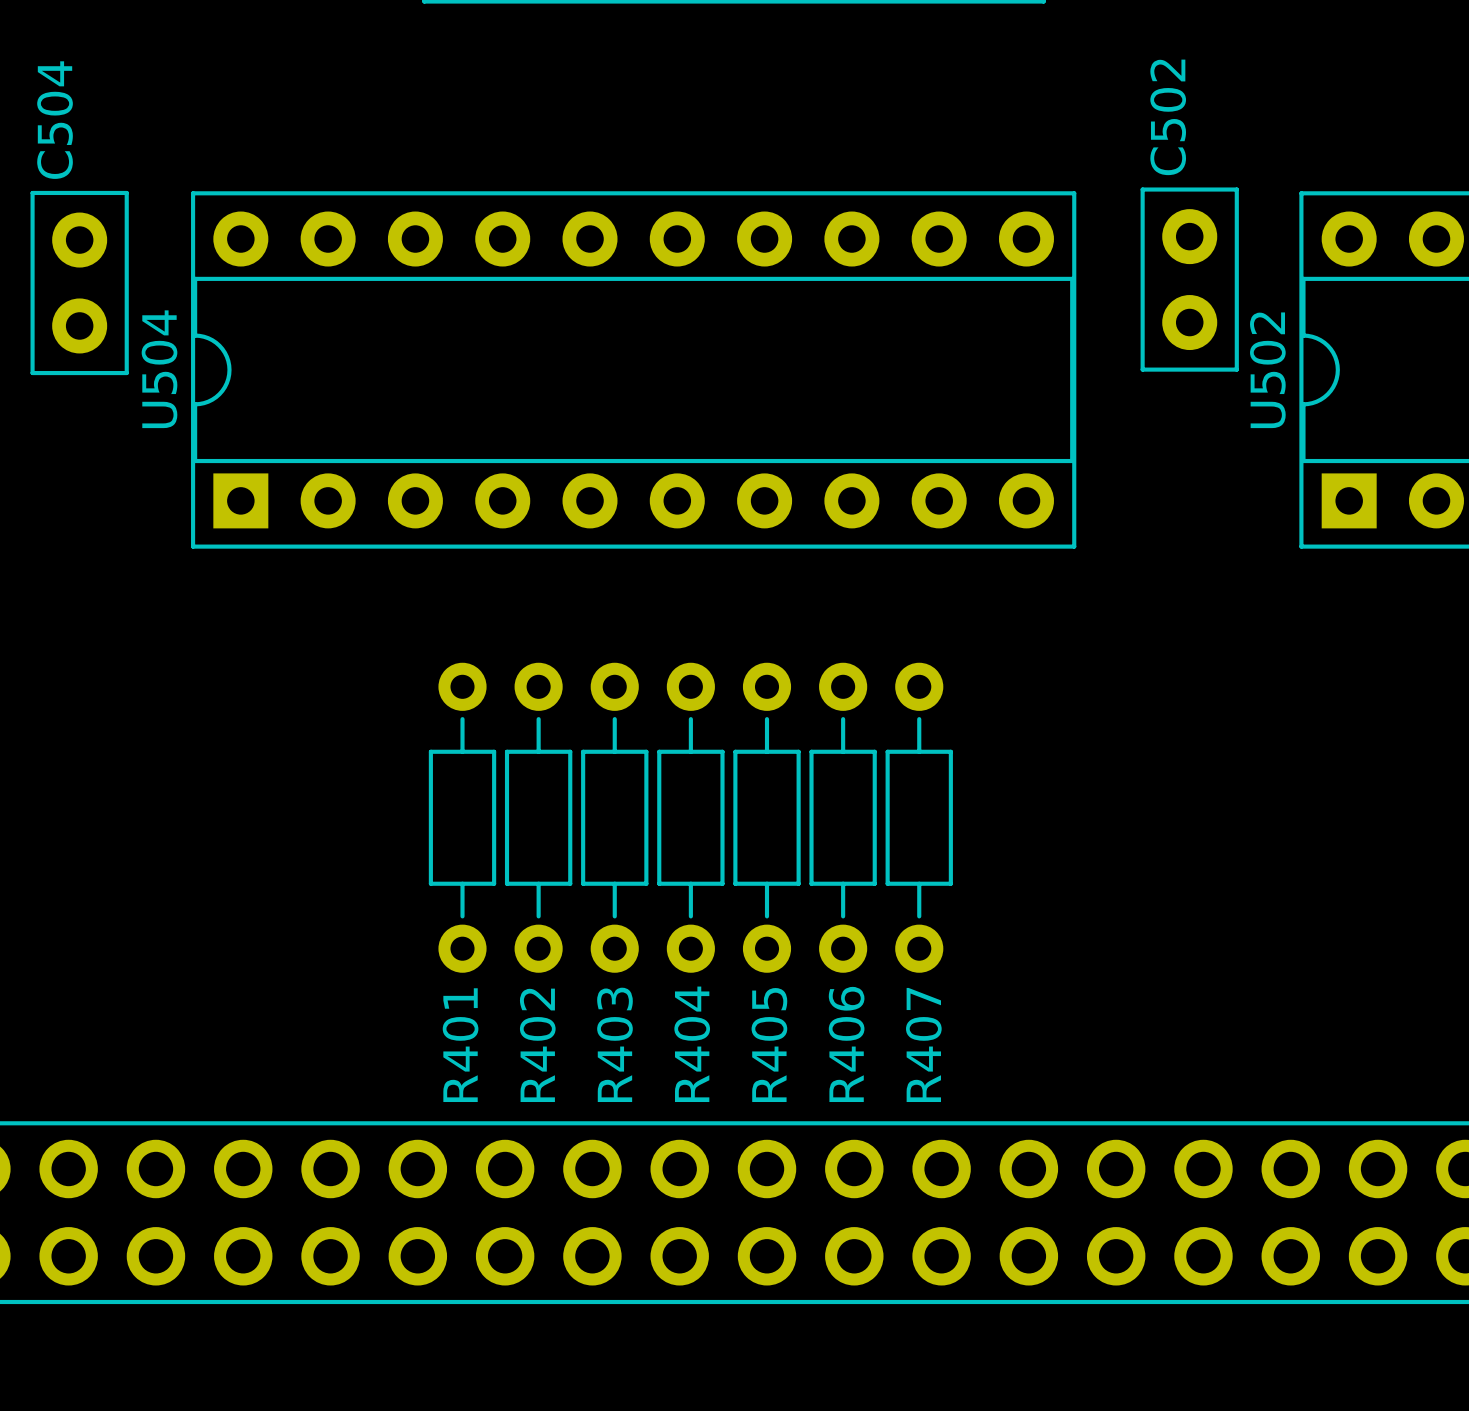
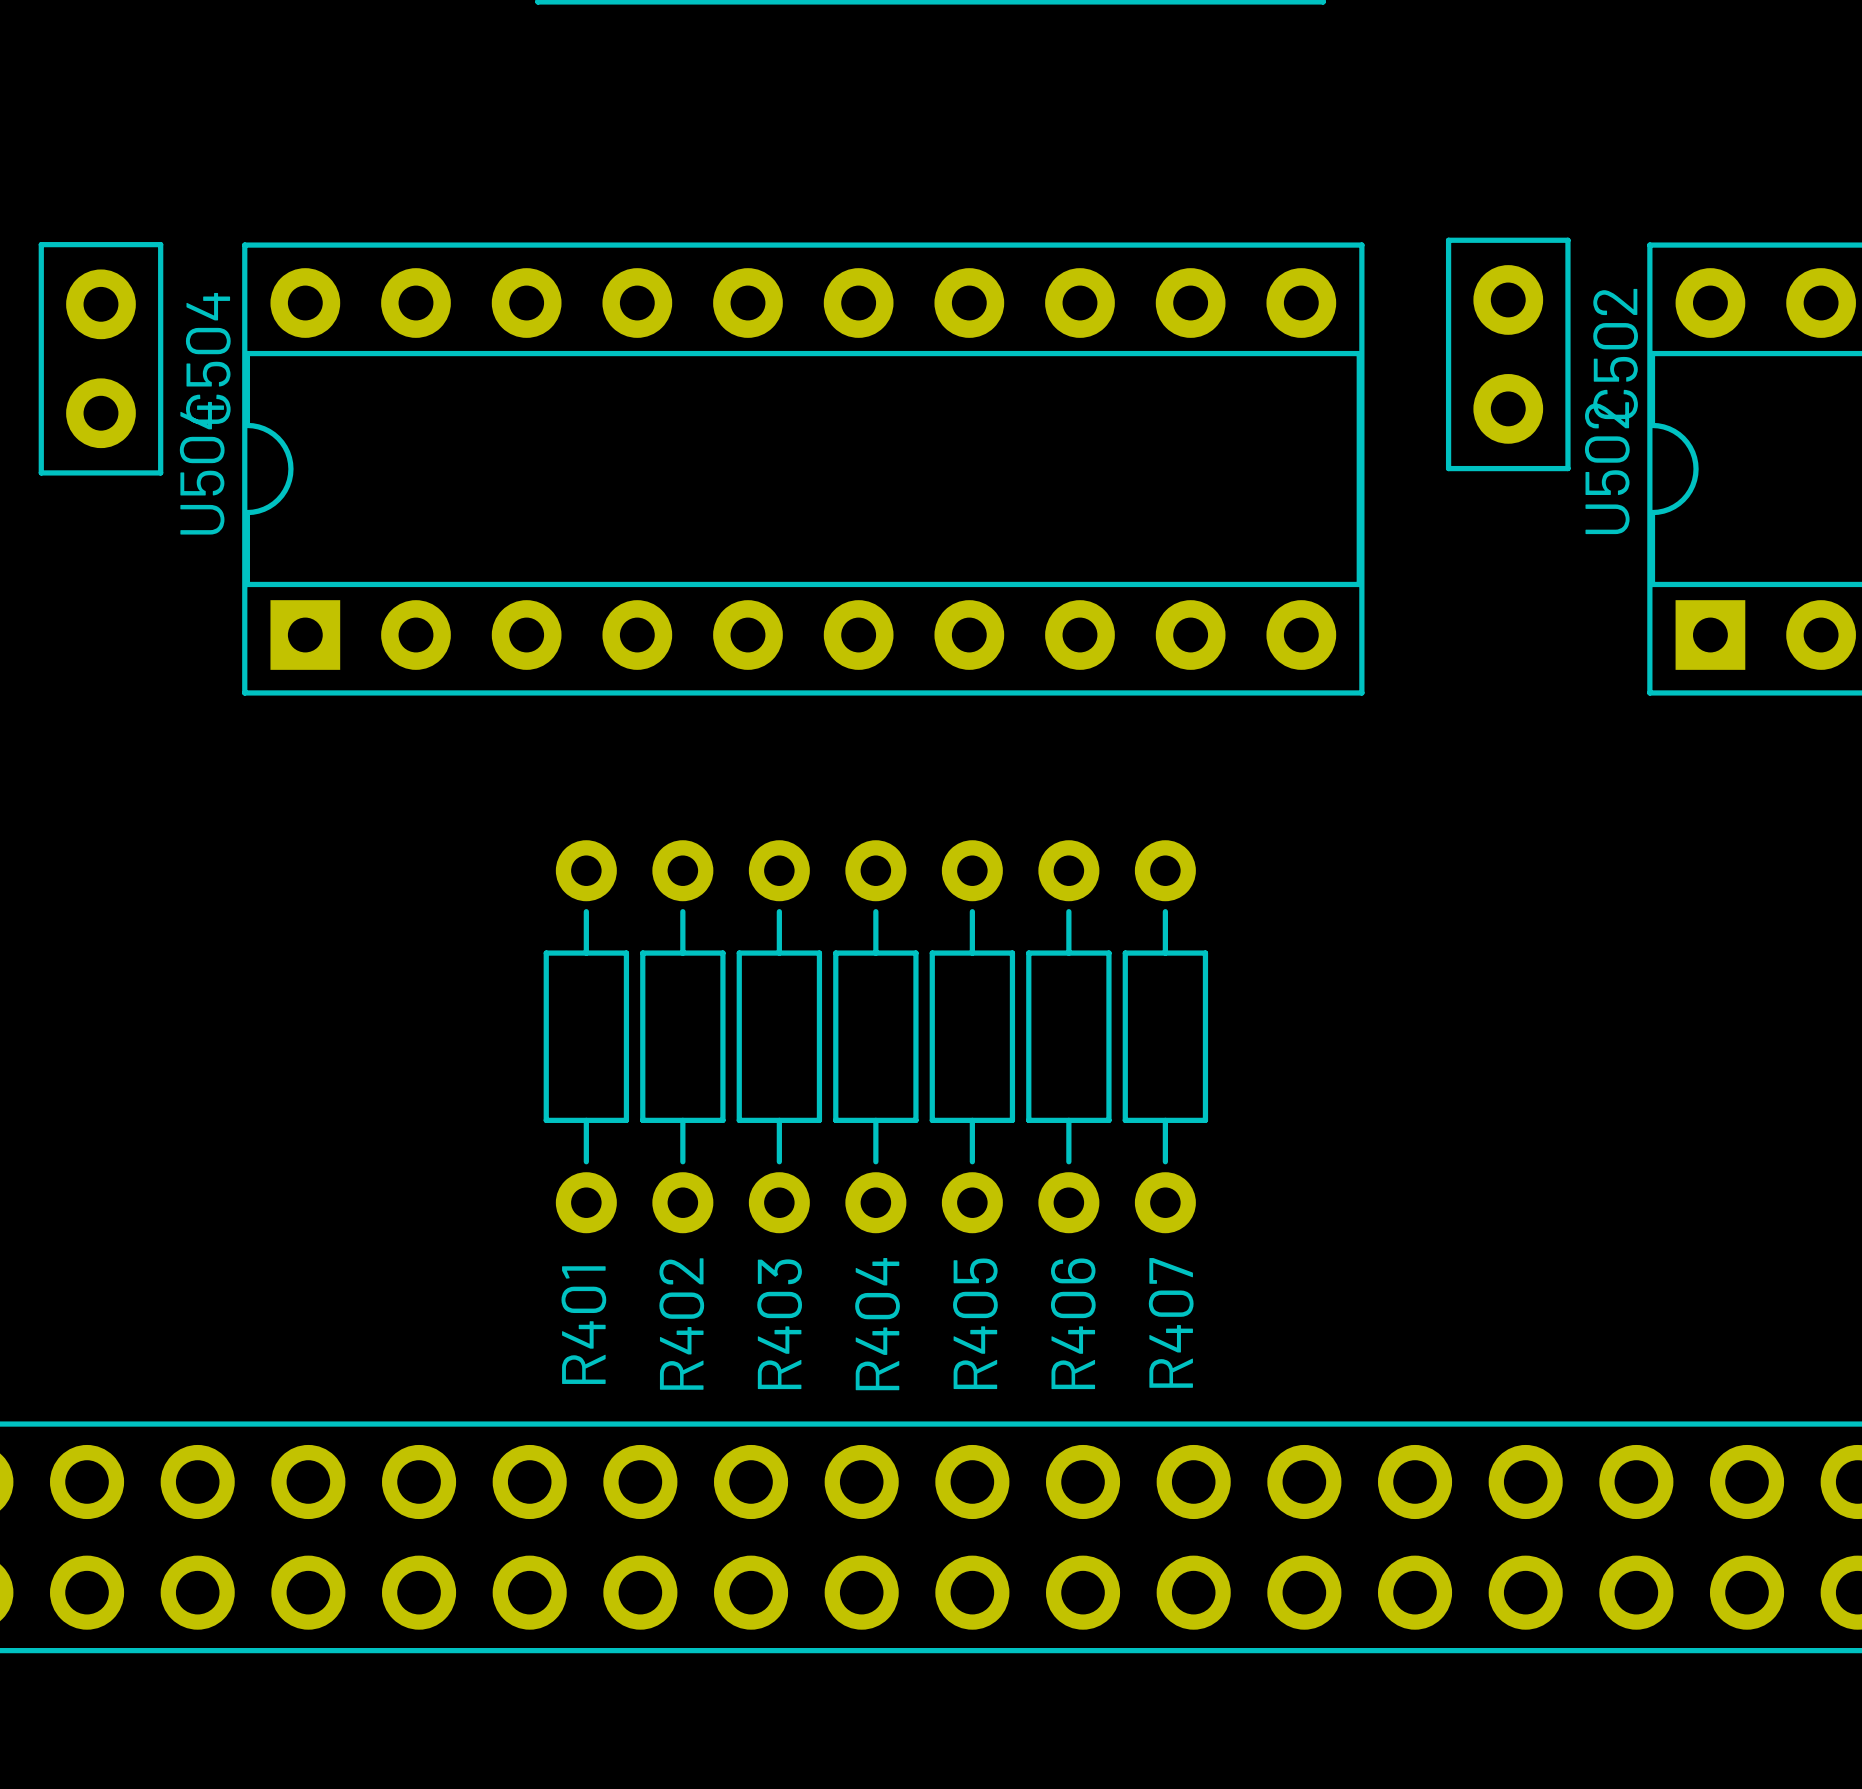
C502 name position: C502 (1168, 117) -> C502 (1615, 353)
C504 name position: C504 (55, 120) -> C504 (208, 358)

